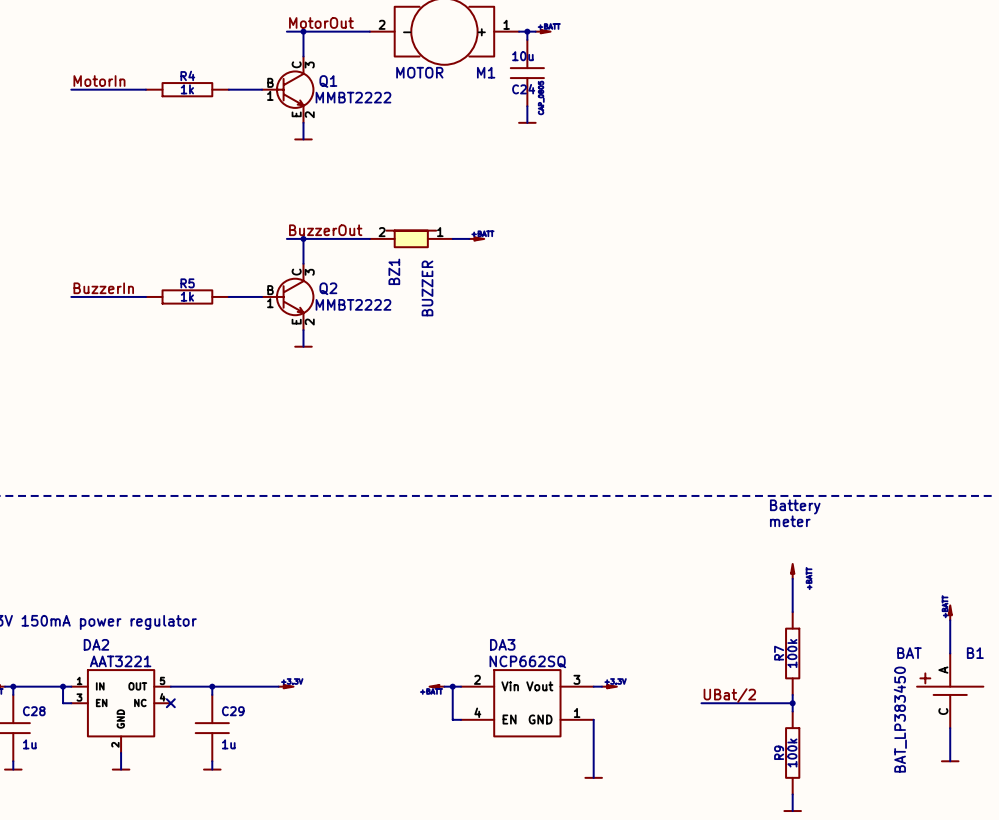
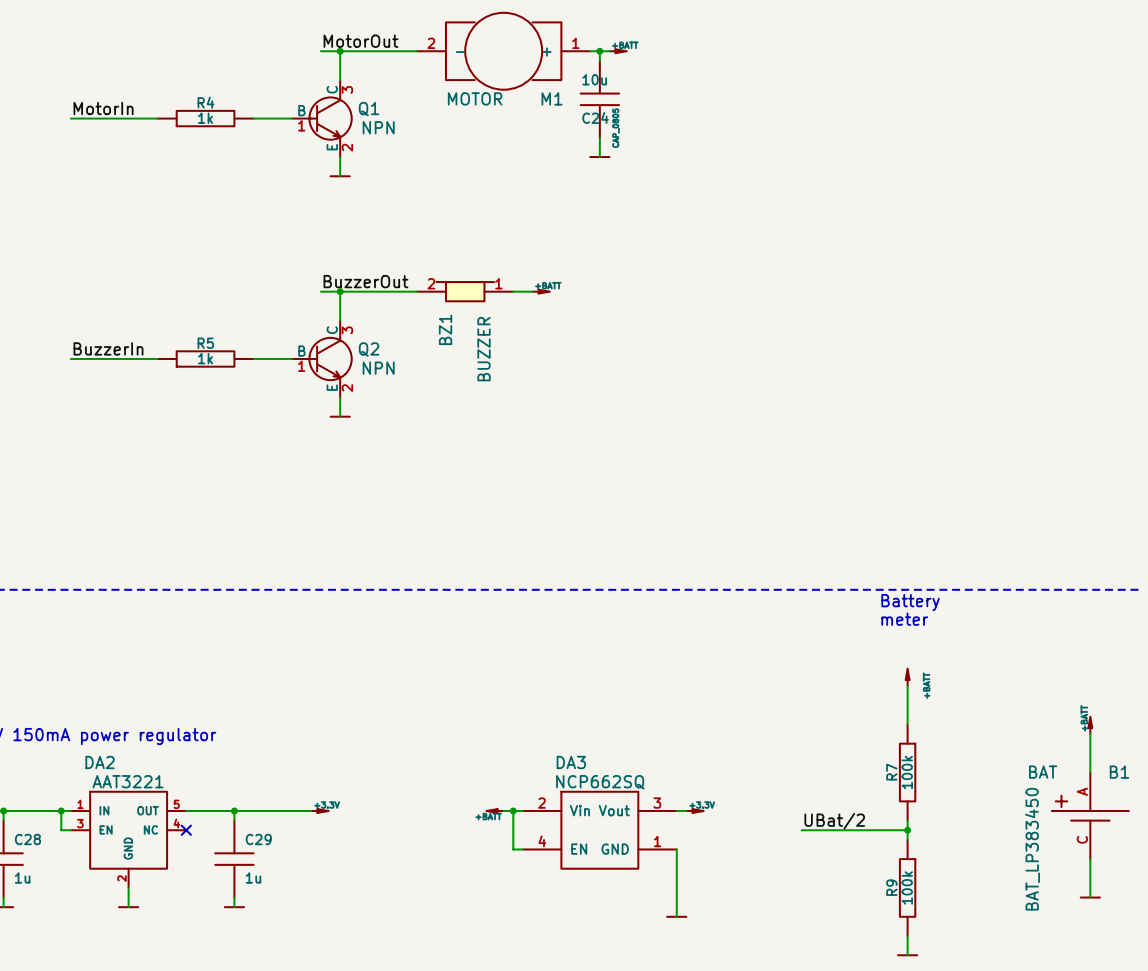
Q1 value: MMBT2222 (353, 97) -> NPN (378, 127)
Q2 value: MMBT2222 (353, 304) -> NPN (378, 368)

